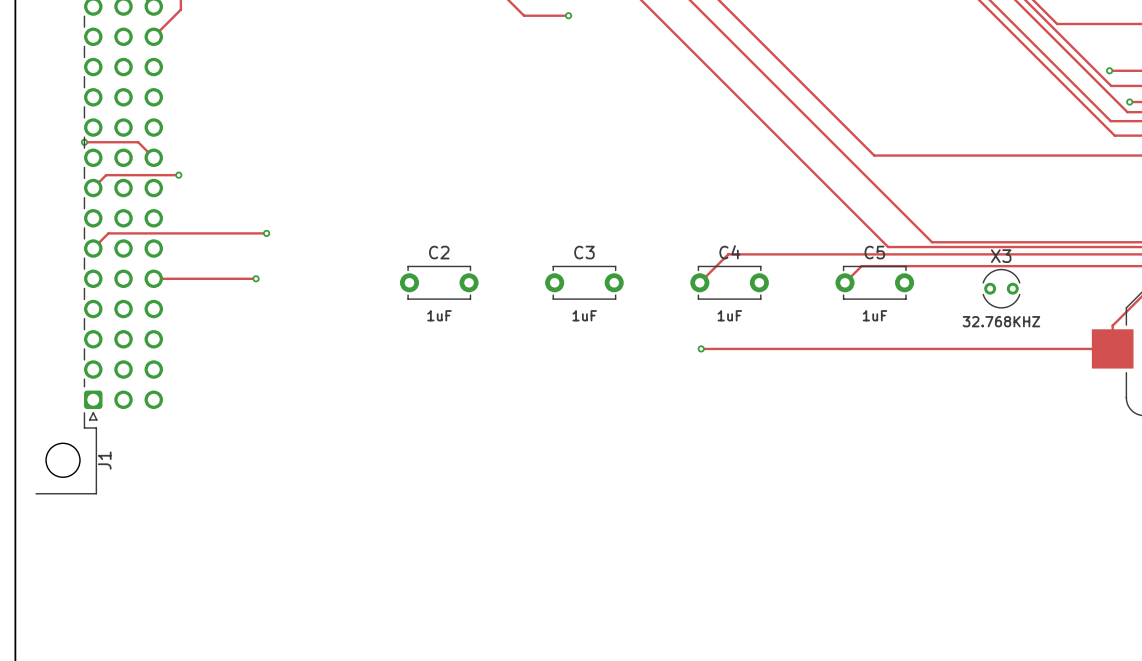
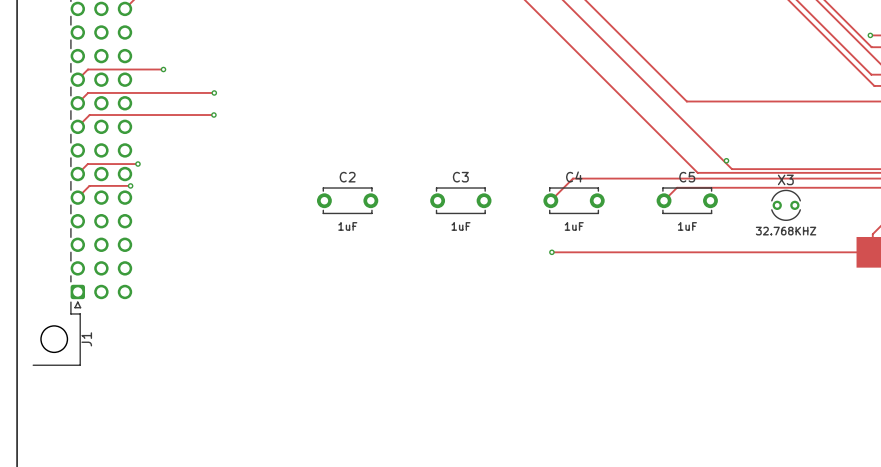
track: none -> (163, 69) (87, 69) (77, 79)
via: none -> (163, 69)
track: (84, 142) (138, 142) (153, 157) -> none
via: (84, 142) -> none
track: none -> (214, 92) (88, 92) (77, 103)
via: none -> (214, 92)
via: none -> (213, 115)
track: (106, 175) (178, 175) -> (87, 116) (89, 115) (213, 115)
via: (178, 175) -> none
via: none -> (726, 160)
track: (266, 233) (108, 233) (106, 235) -> (137, 164) (87, 164)
via: (266, 233) -> none
via: none -> (137, 164)
track: none -> (130, 185) (89, 185) (77, 197)
via: none -> (130, 185)
track: (153, 278) (256, 278) -> none
via: (256, 278) -> none

